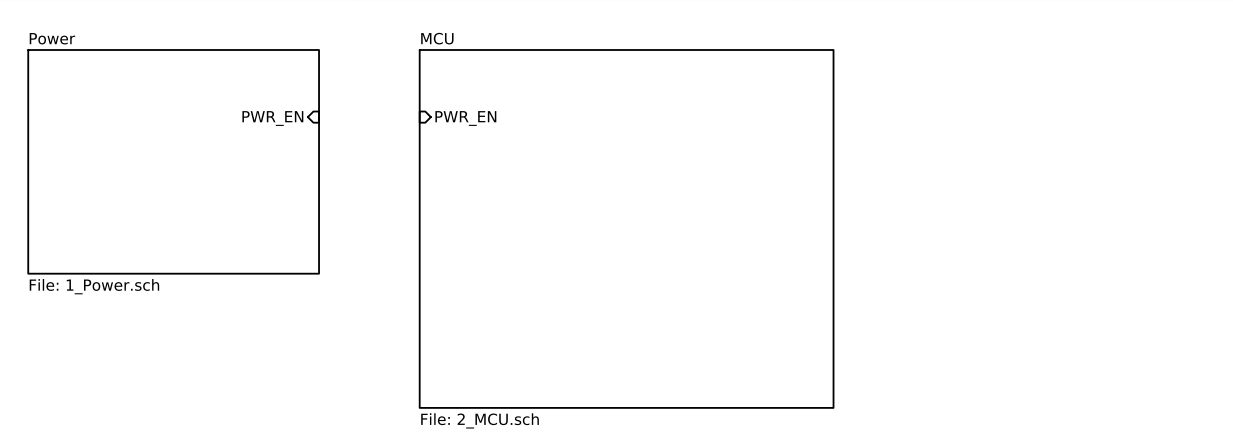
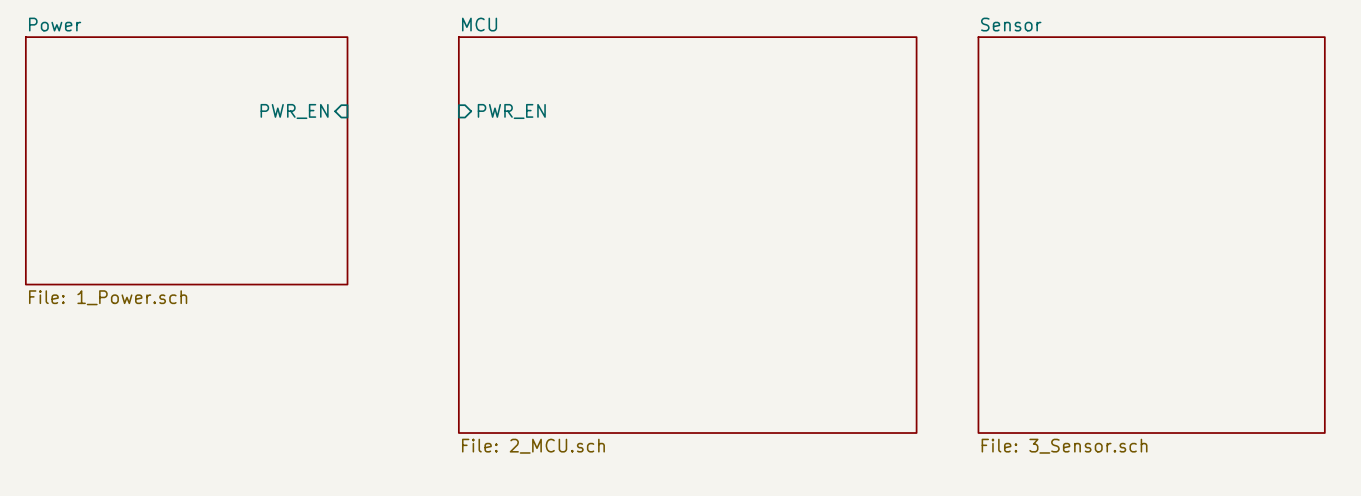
sheet Sensor: none -> File: 3_Sensor.sch (1151, 235)

